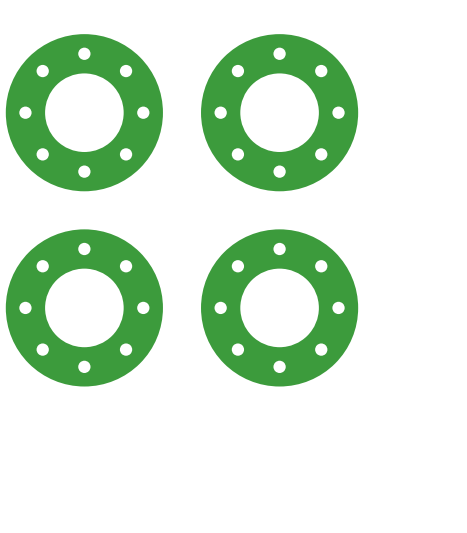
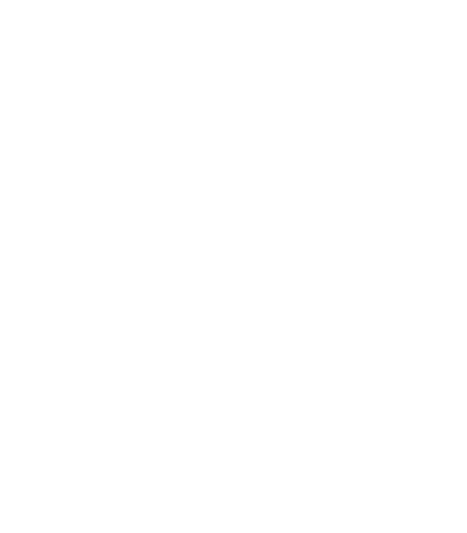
part: (84, 112) -> none
part: (279, 112) -> none
part: (84, 307) -> none
part: (279, 307) -> none

